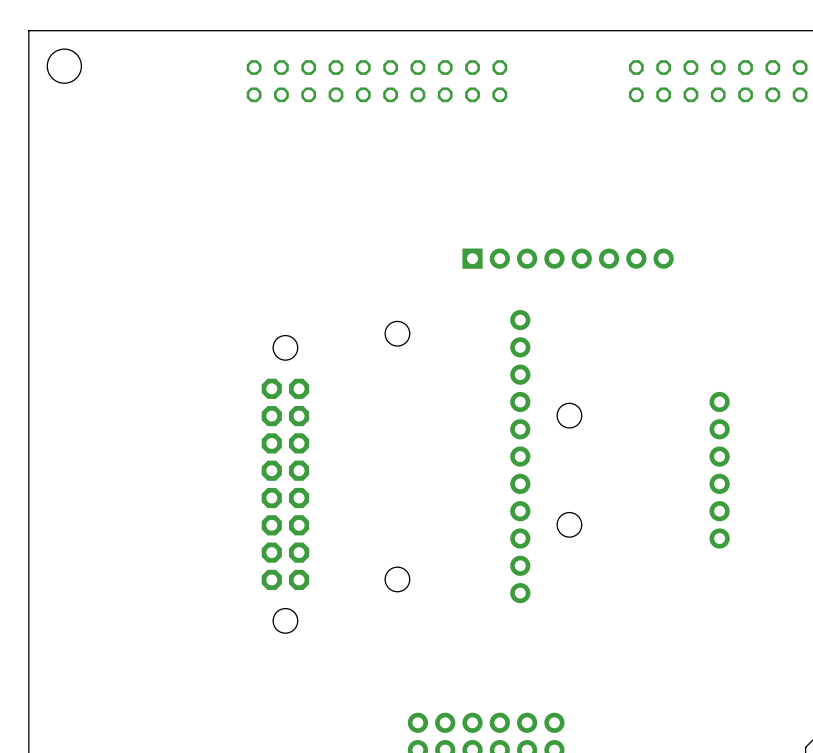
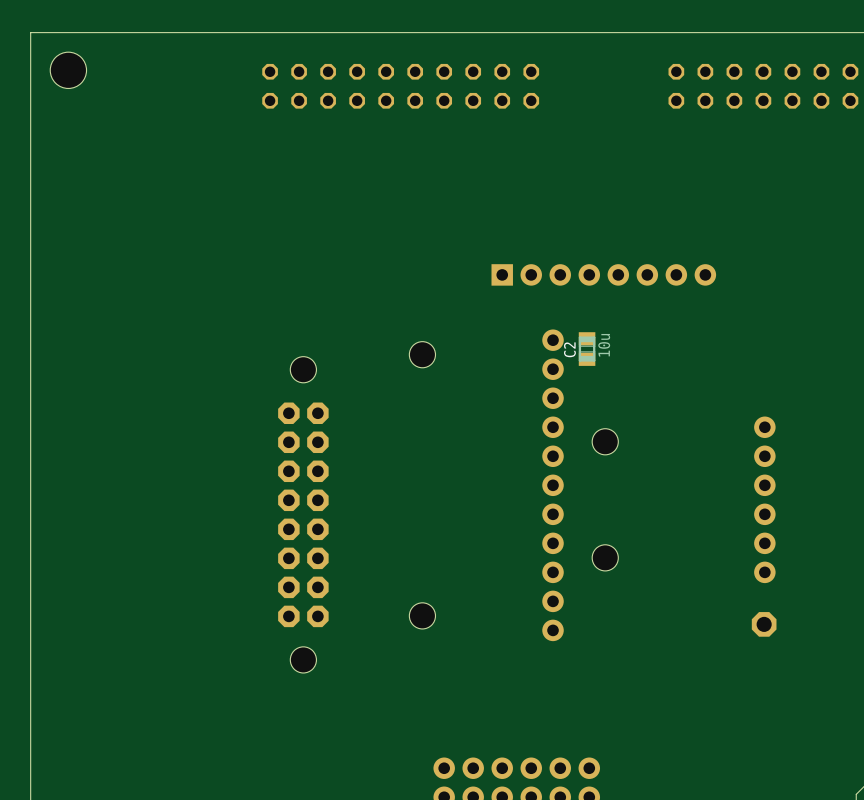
C2: none -> 10u (587, 349)
part: none -> (764, 624)

